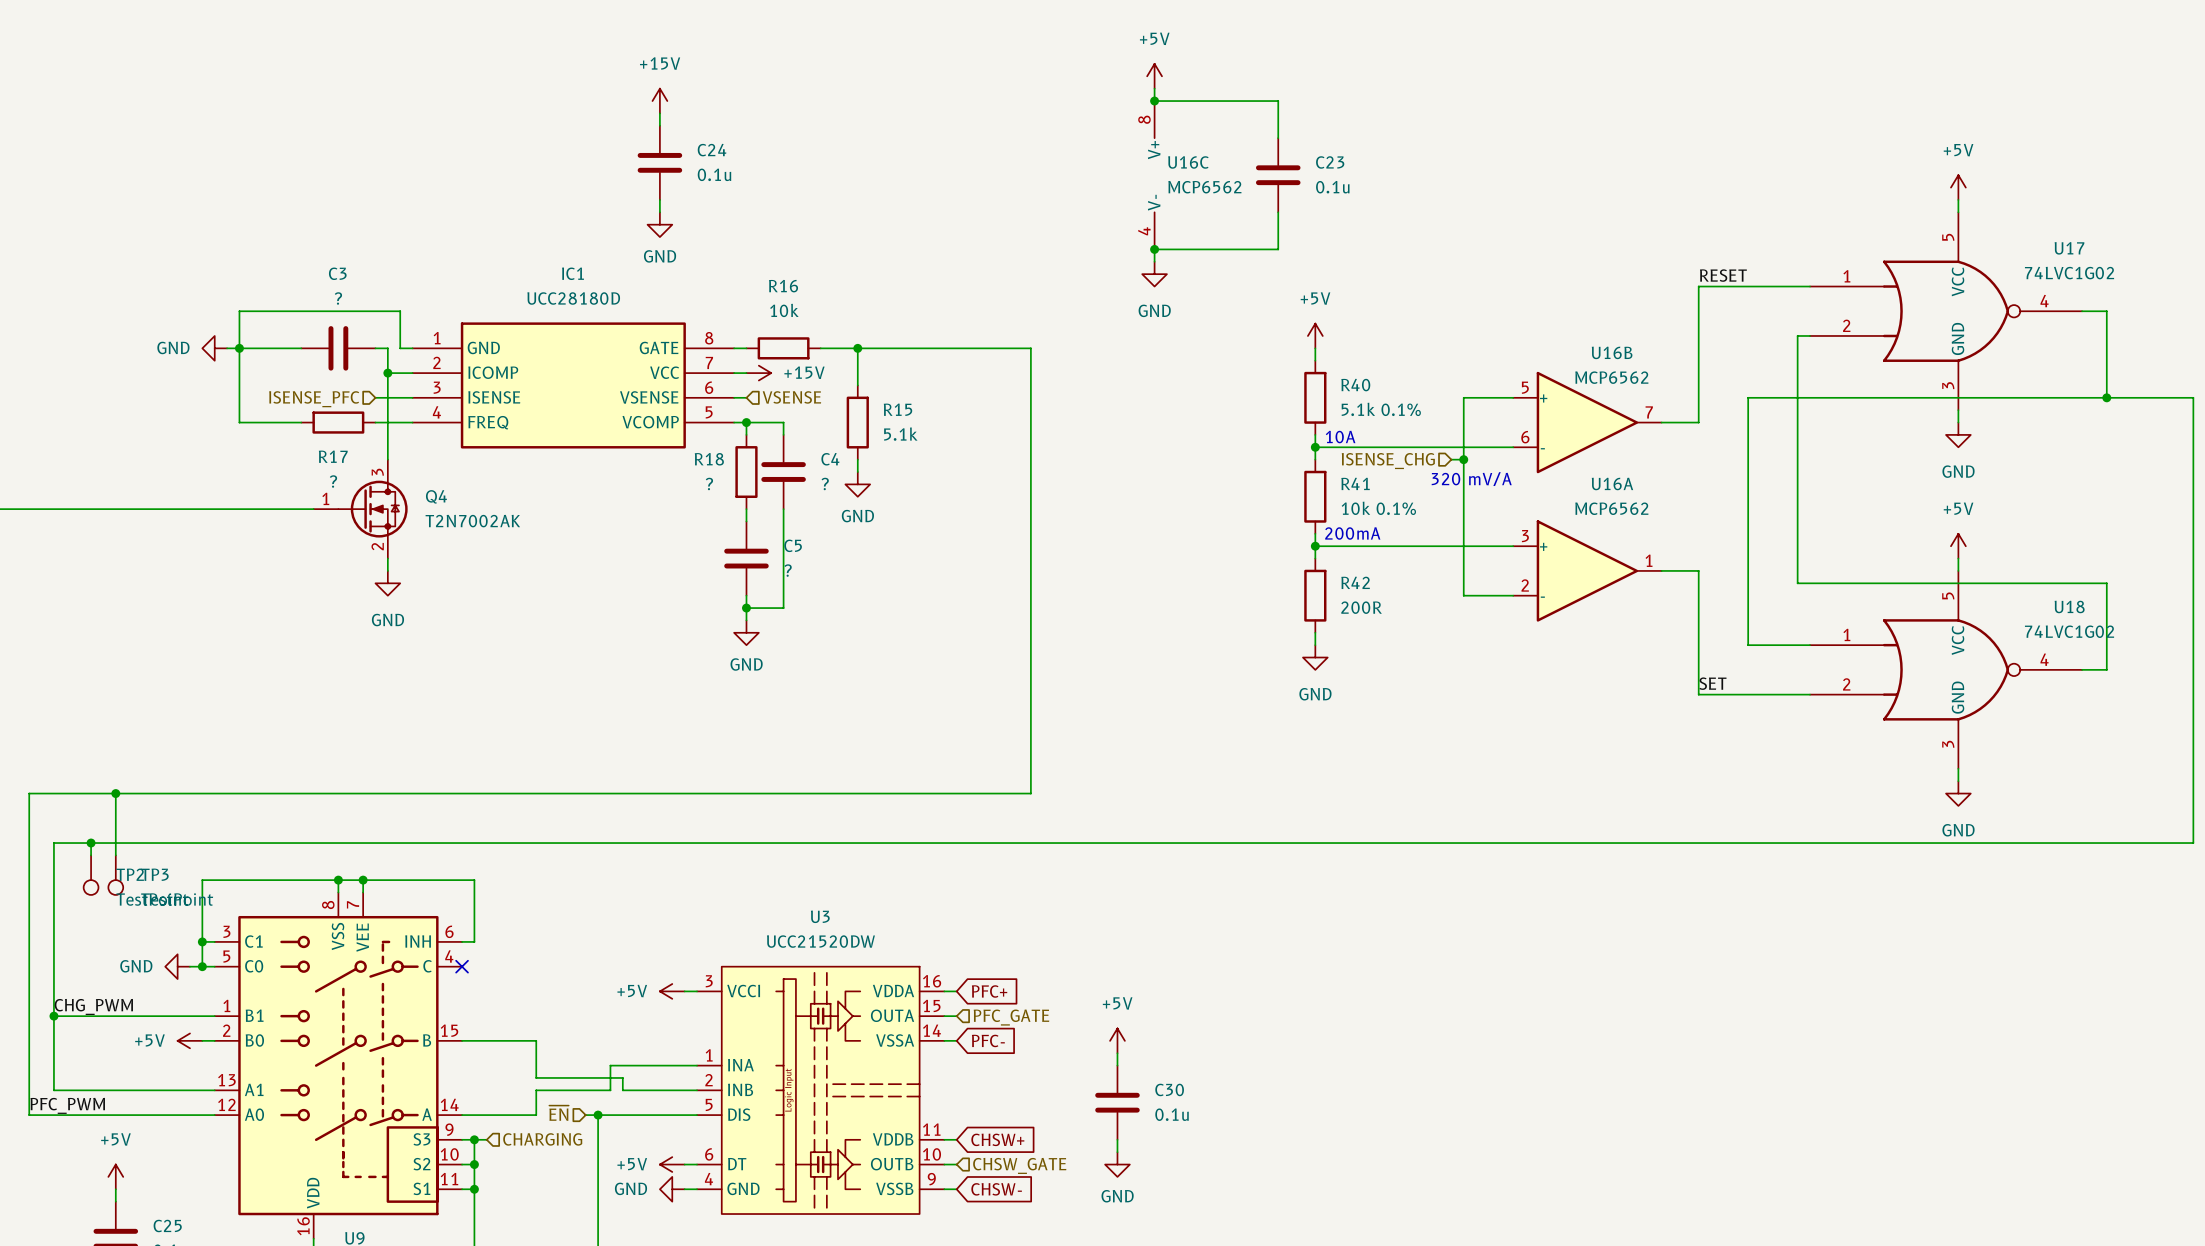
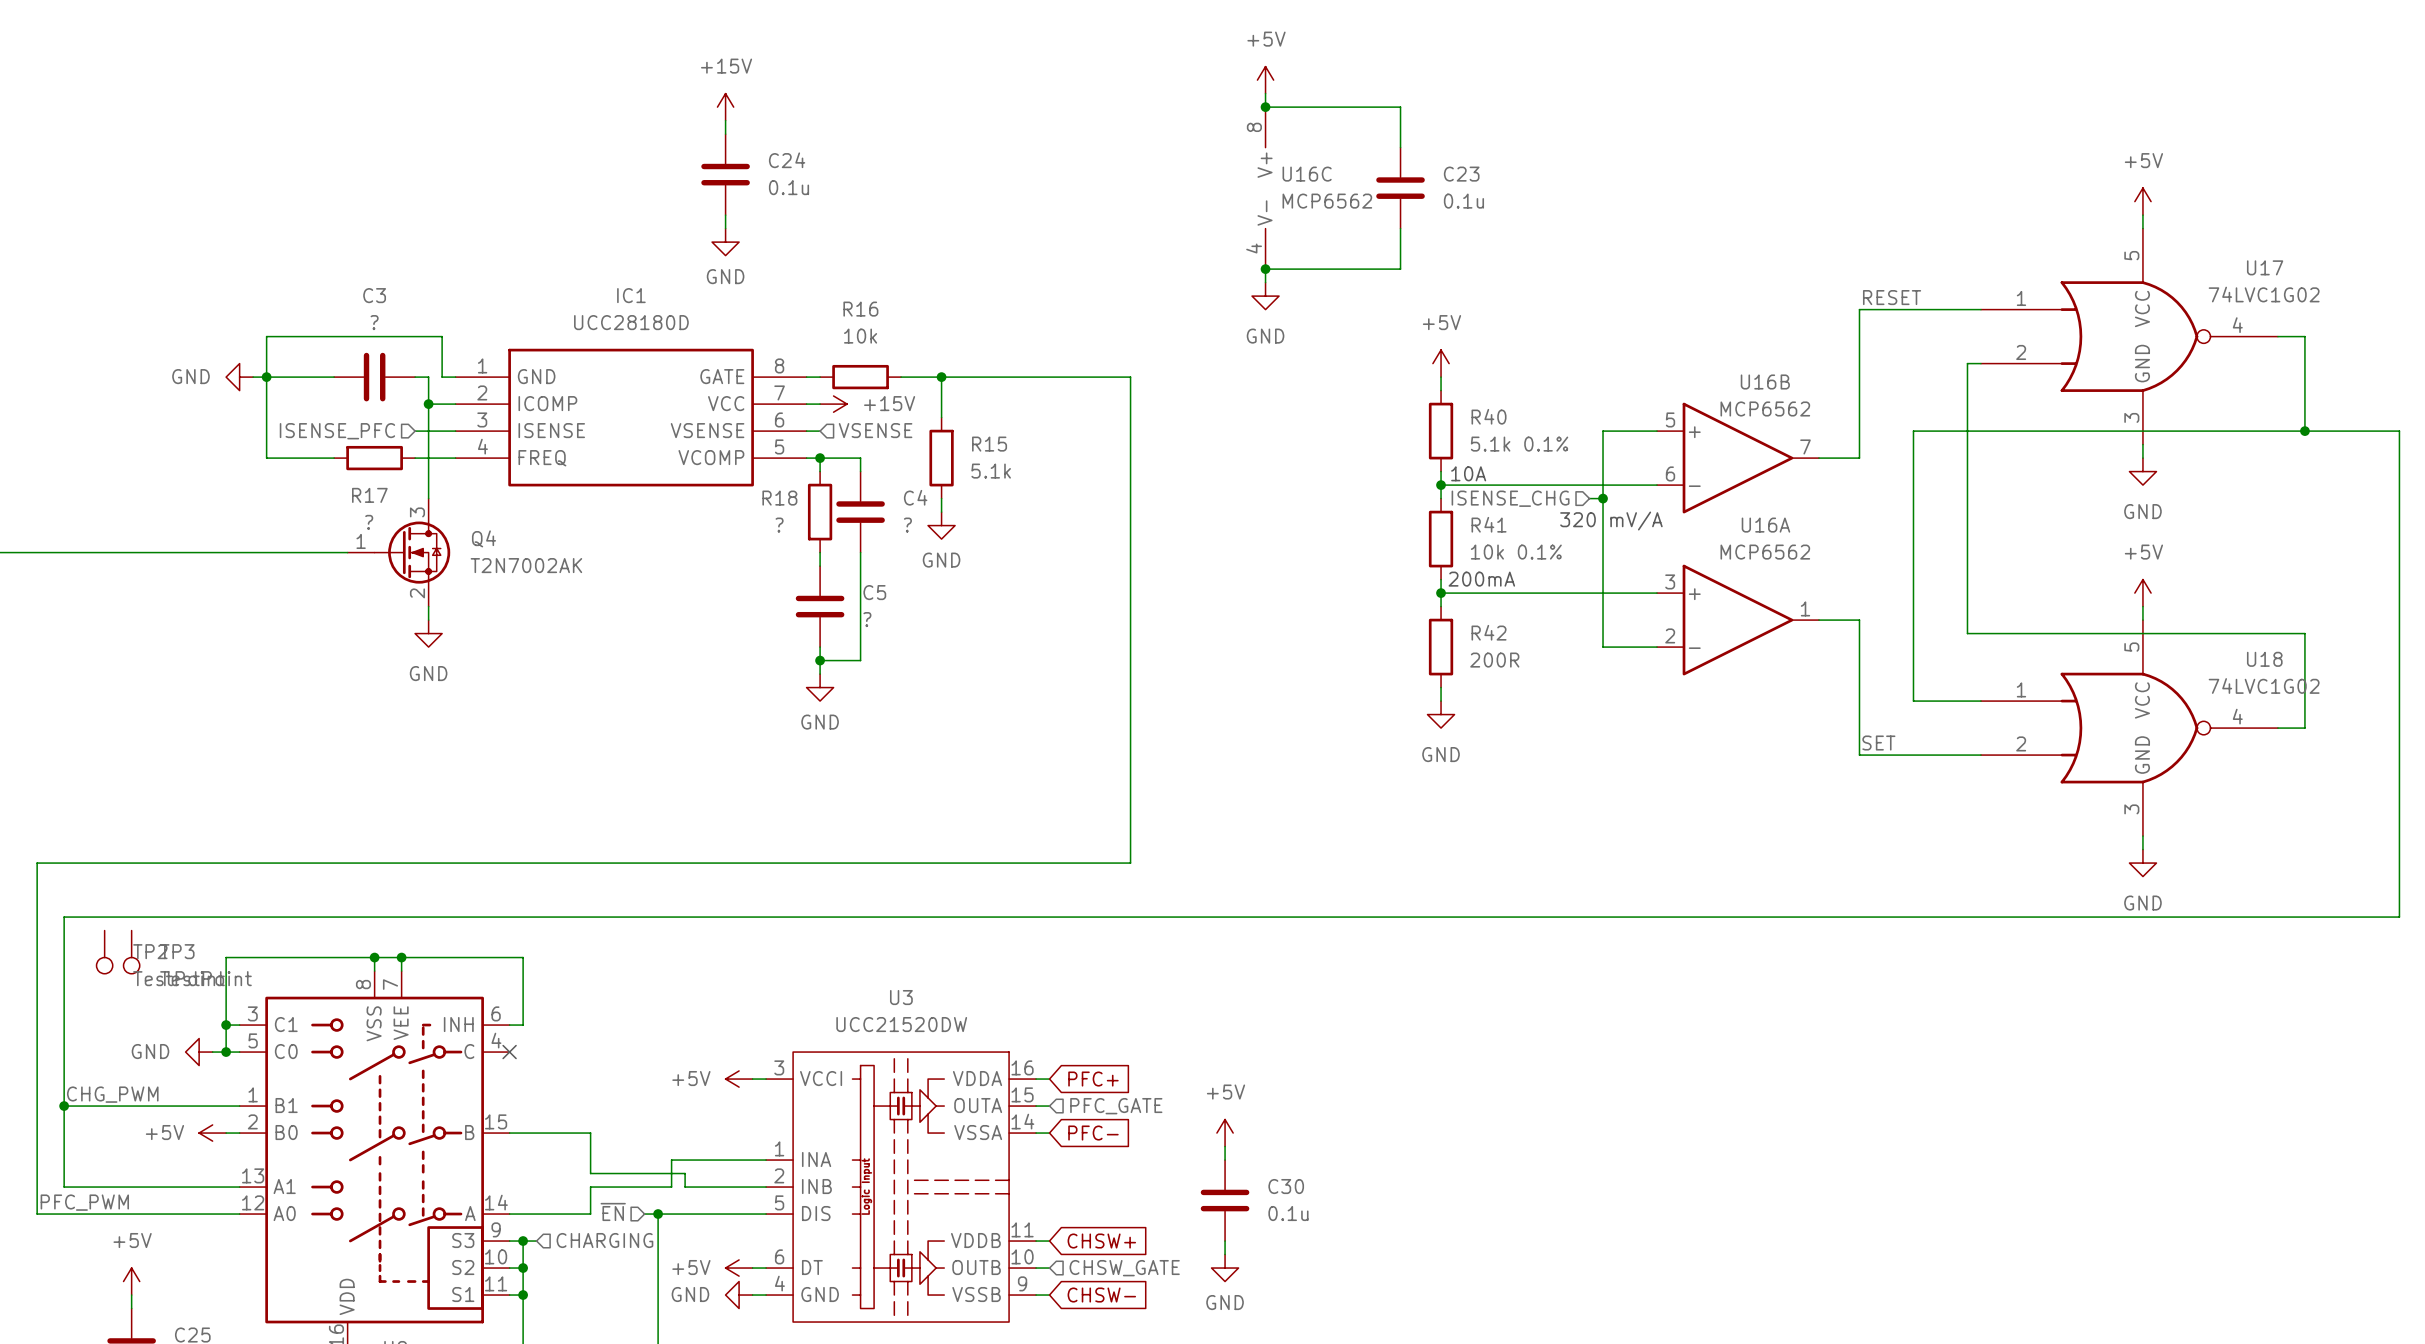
wire: (115, 793) (115, 855) -> none
junction: (115, 793) -> none
wire: (91, 843) (91, 855) -> none
junction: (91, 843) -> none

